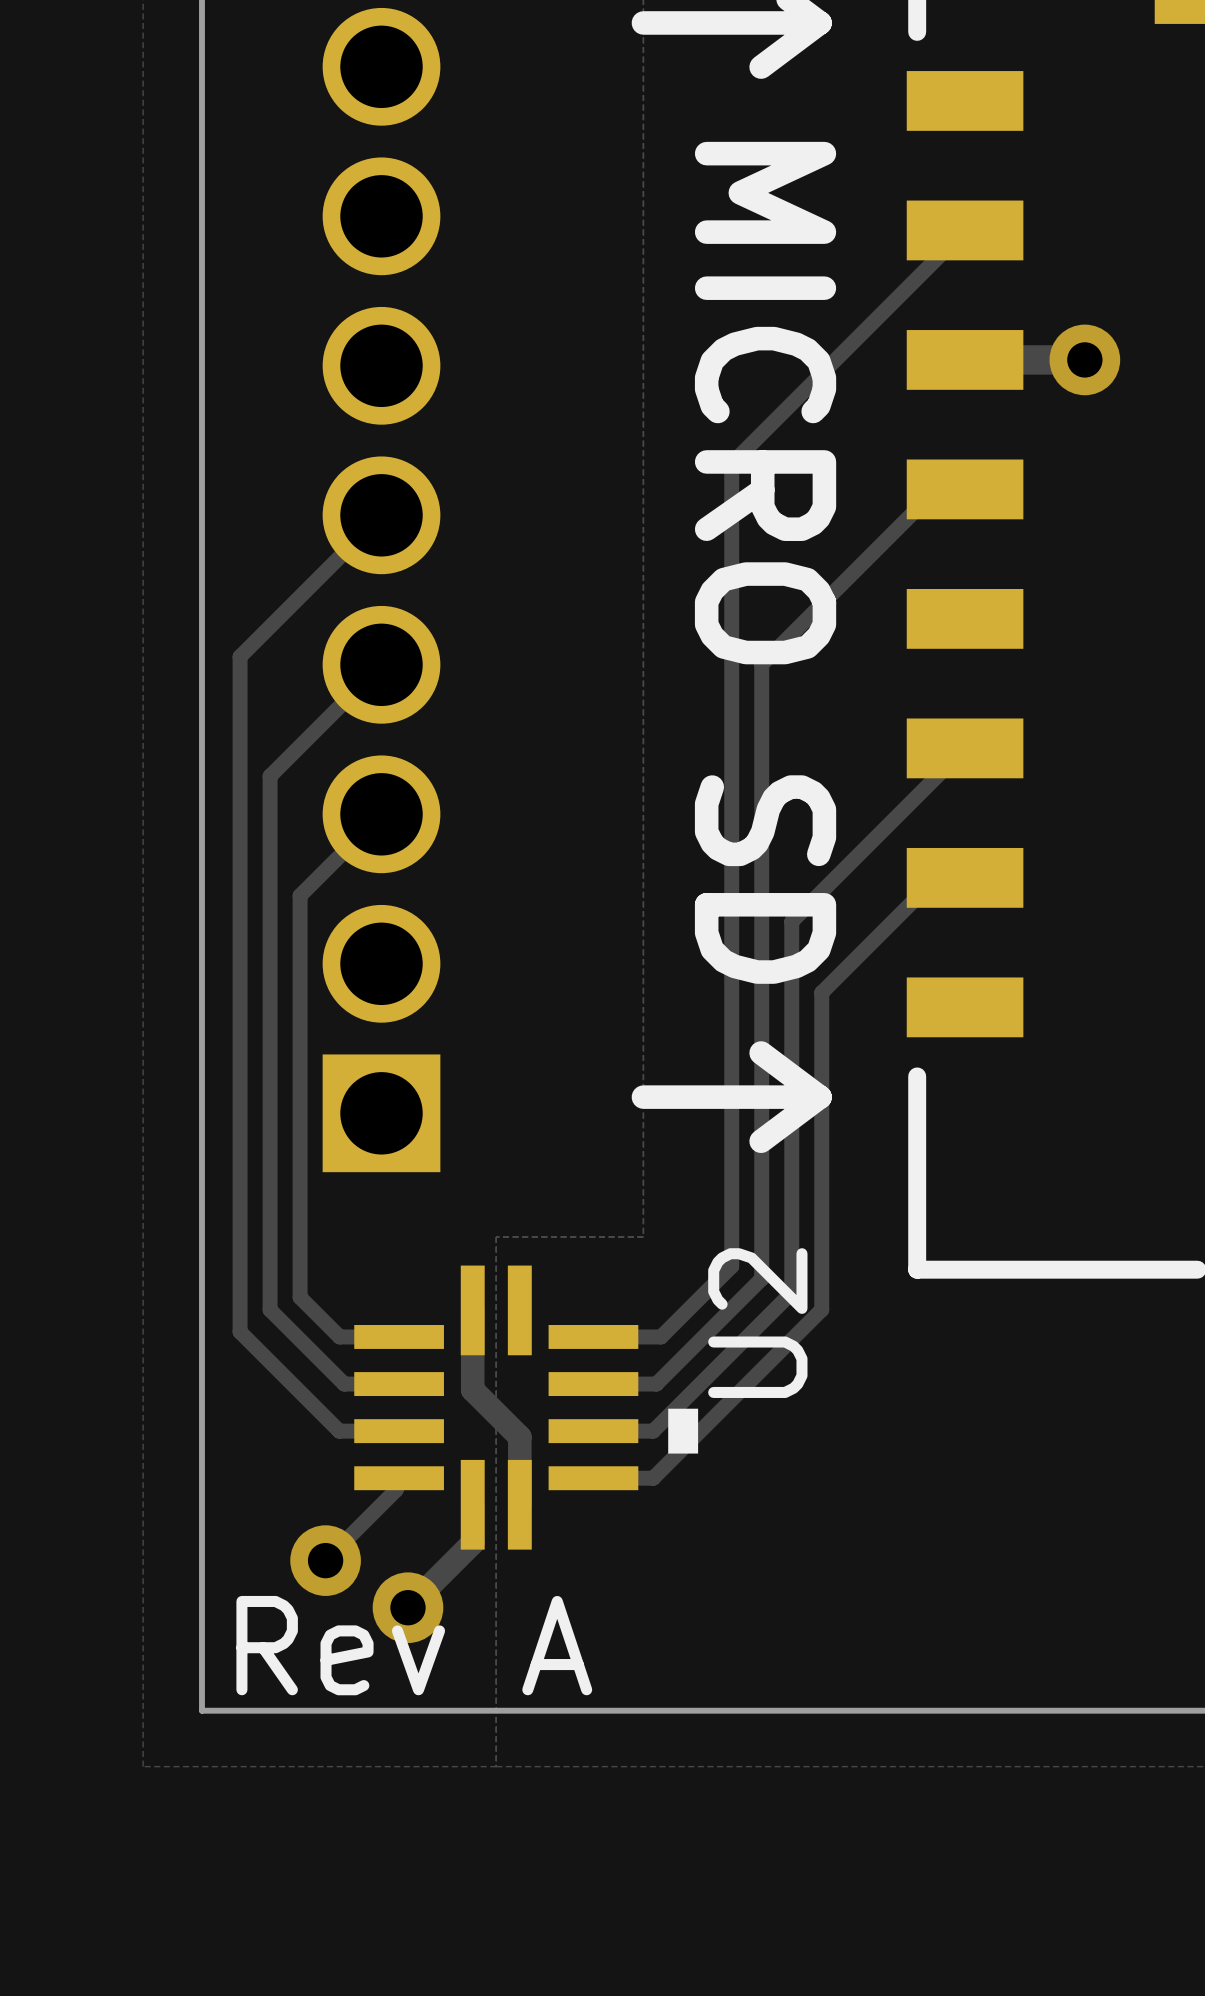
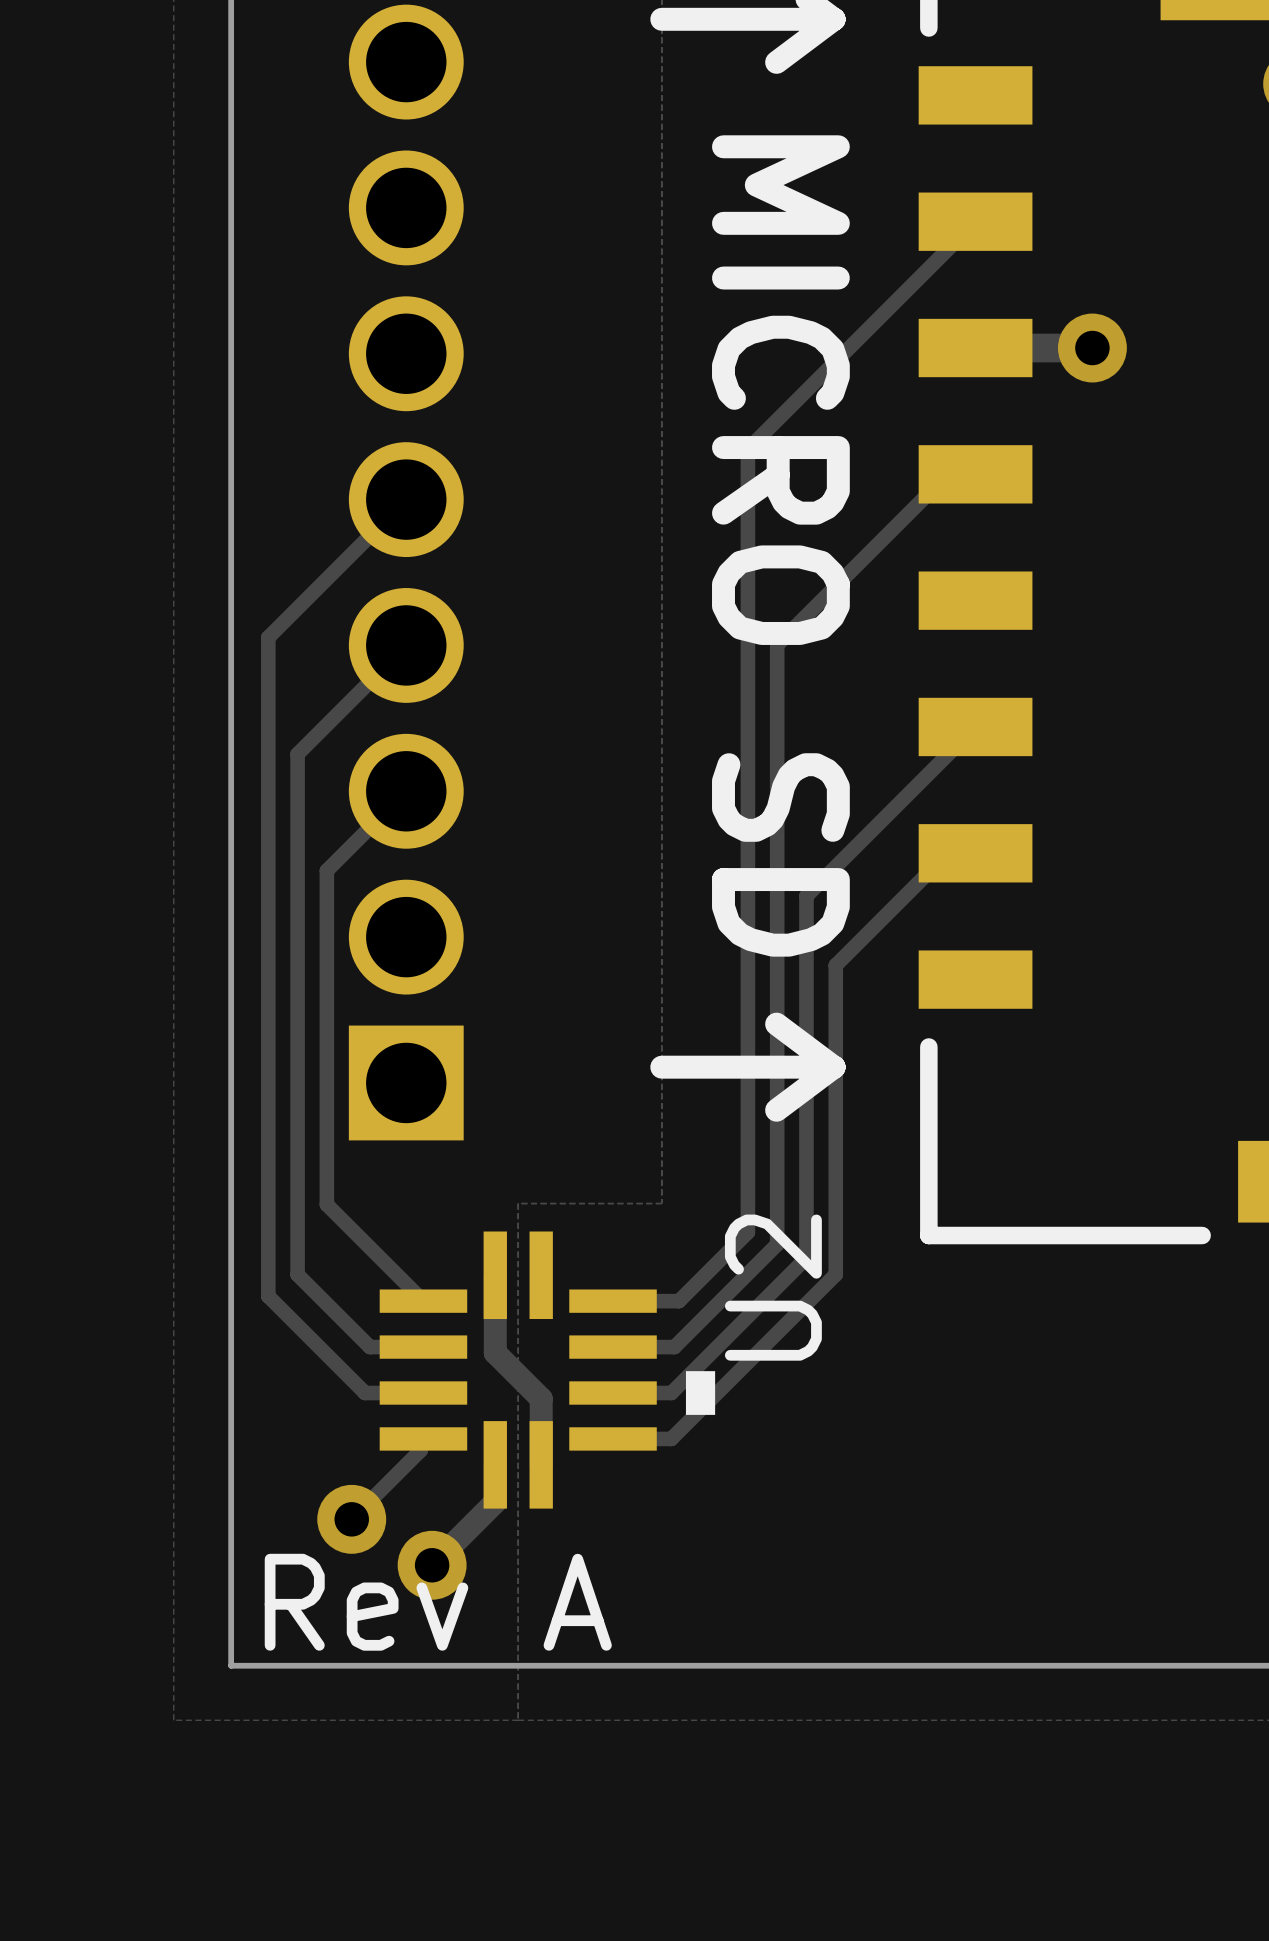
track: (300, 1237) (300, 1297) (339, 1336) (399, 1336) -> (326, 1204) (423, 1301)

